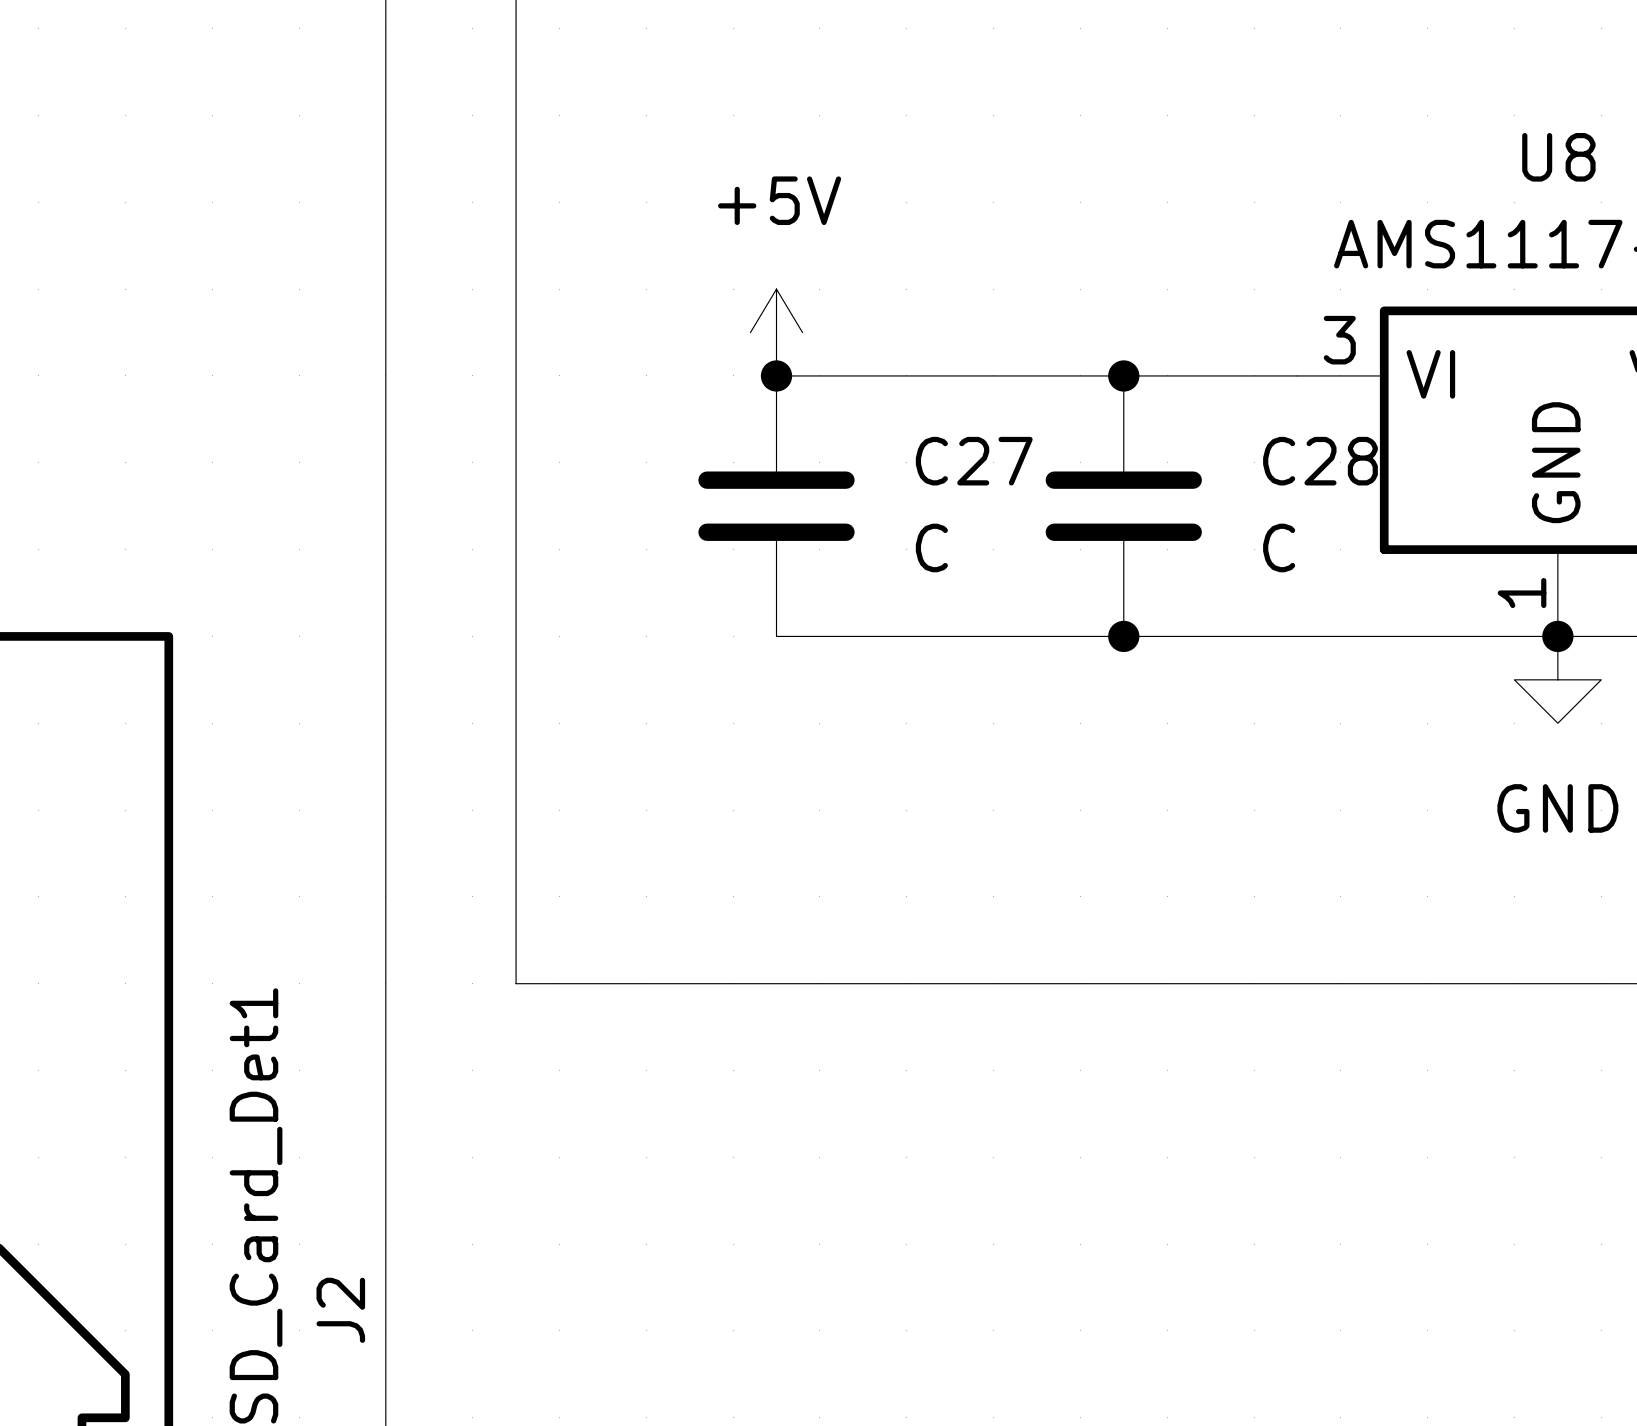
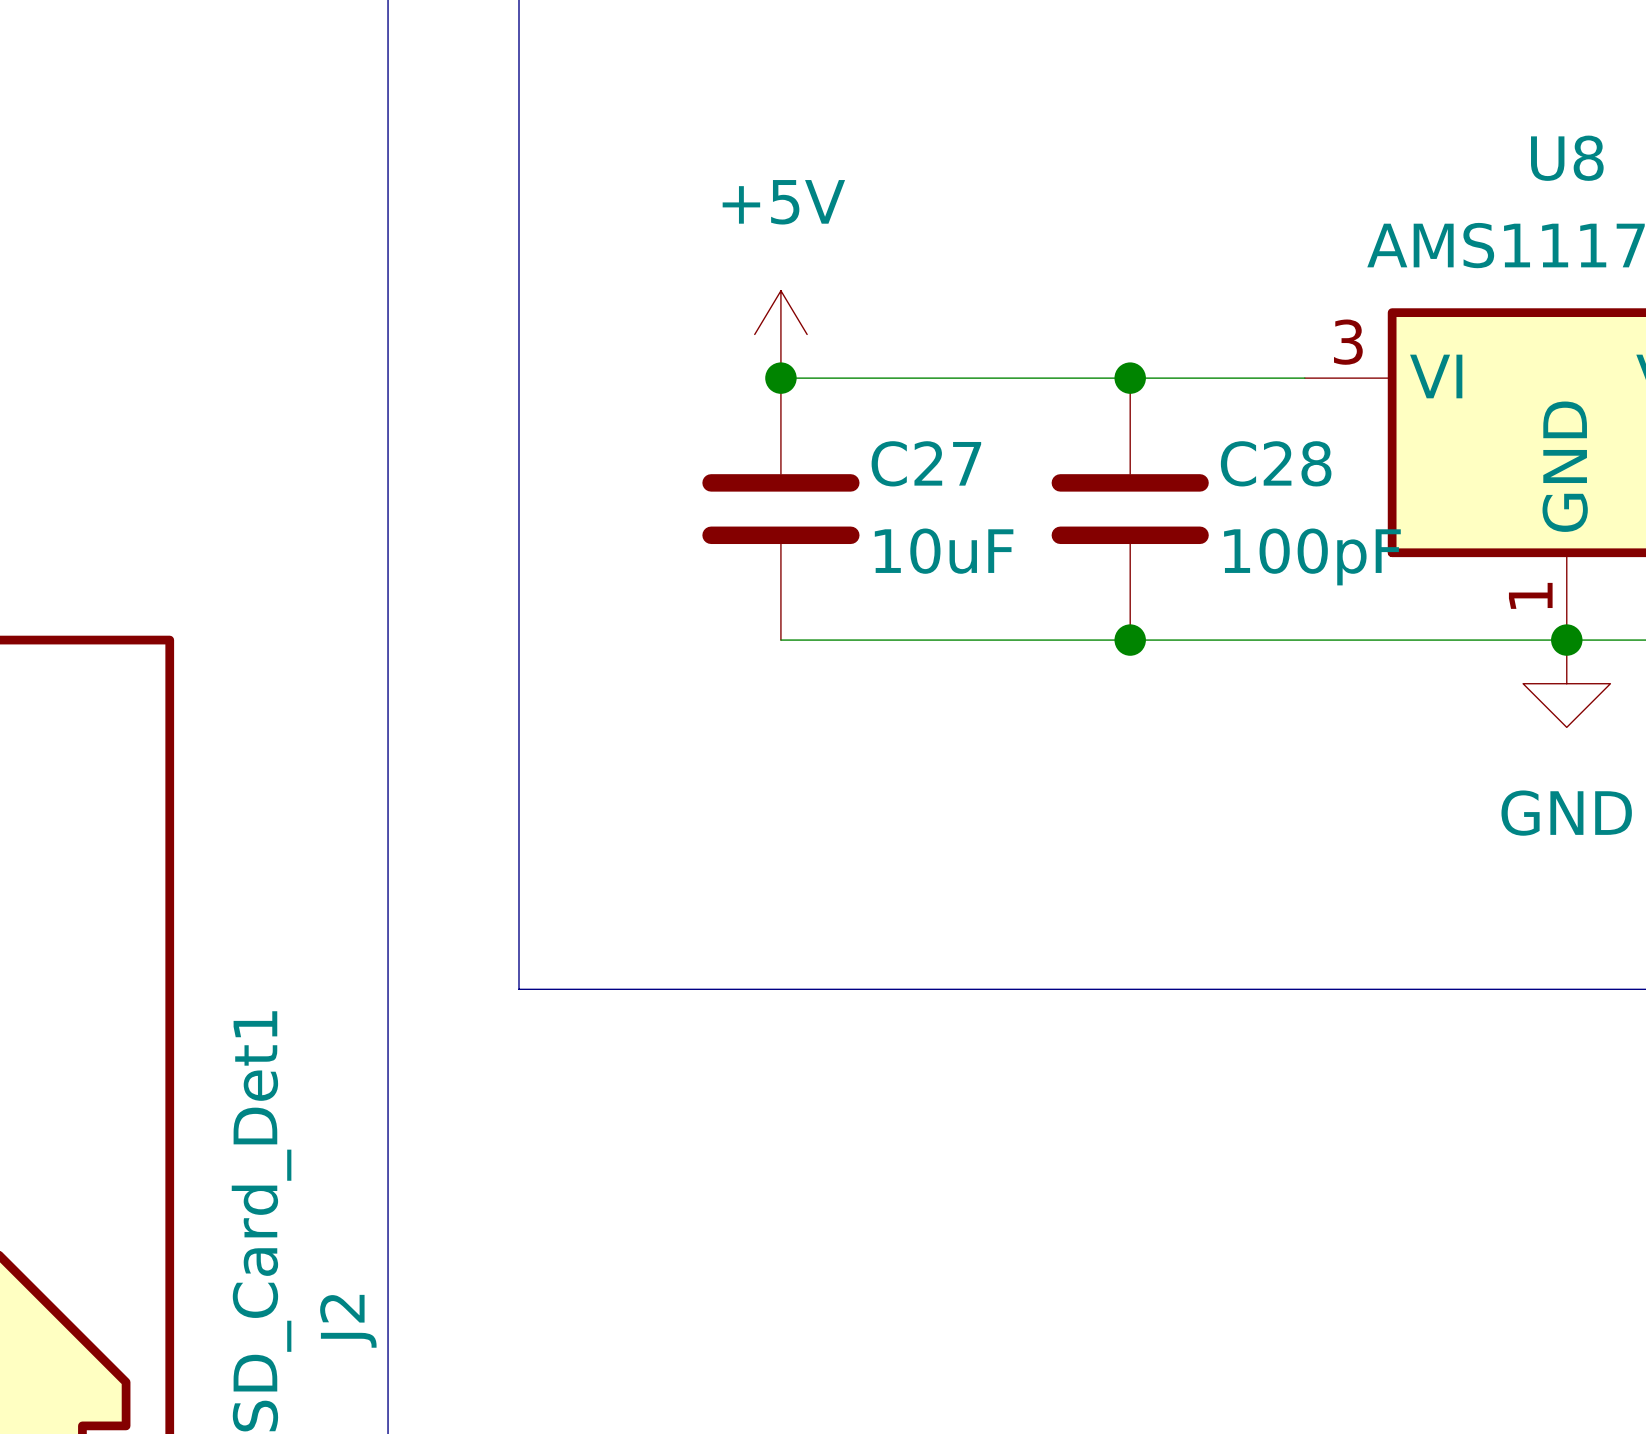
C27 name position: C27 (974, 461) -> C27 (926, 463)
C28 name position: C28 (1320, 461) -> C28 (1276, 463)
C27 value: C (931, 547) -> 10uF (944, 551)
C28 value: C (1279, 547) -> 100pF (1312, 556)

